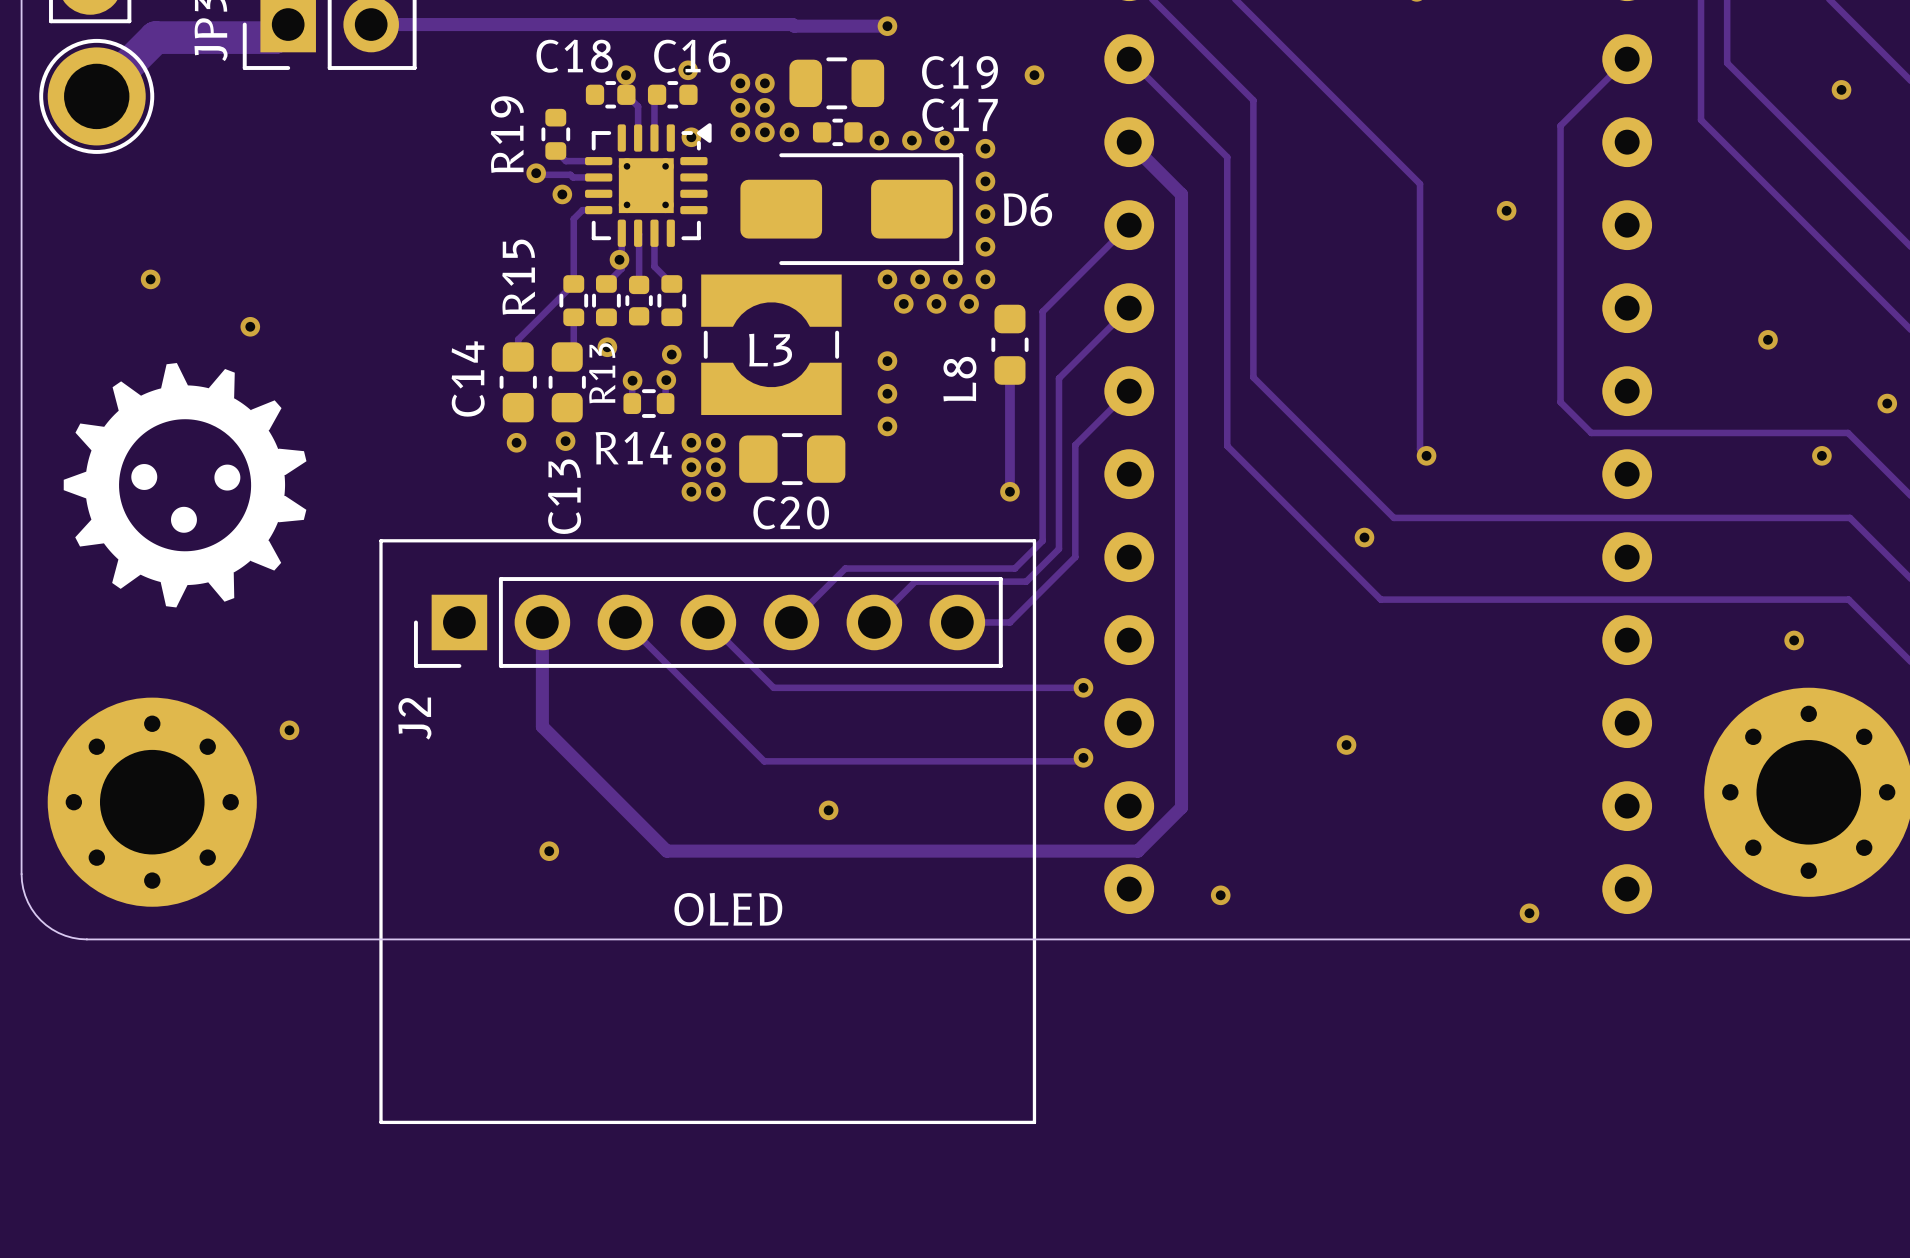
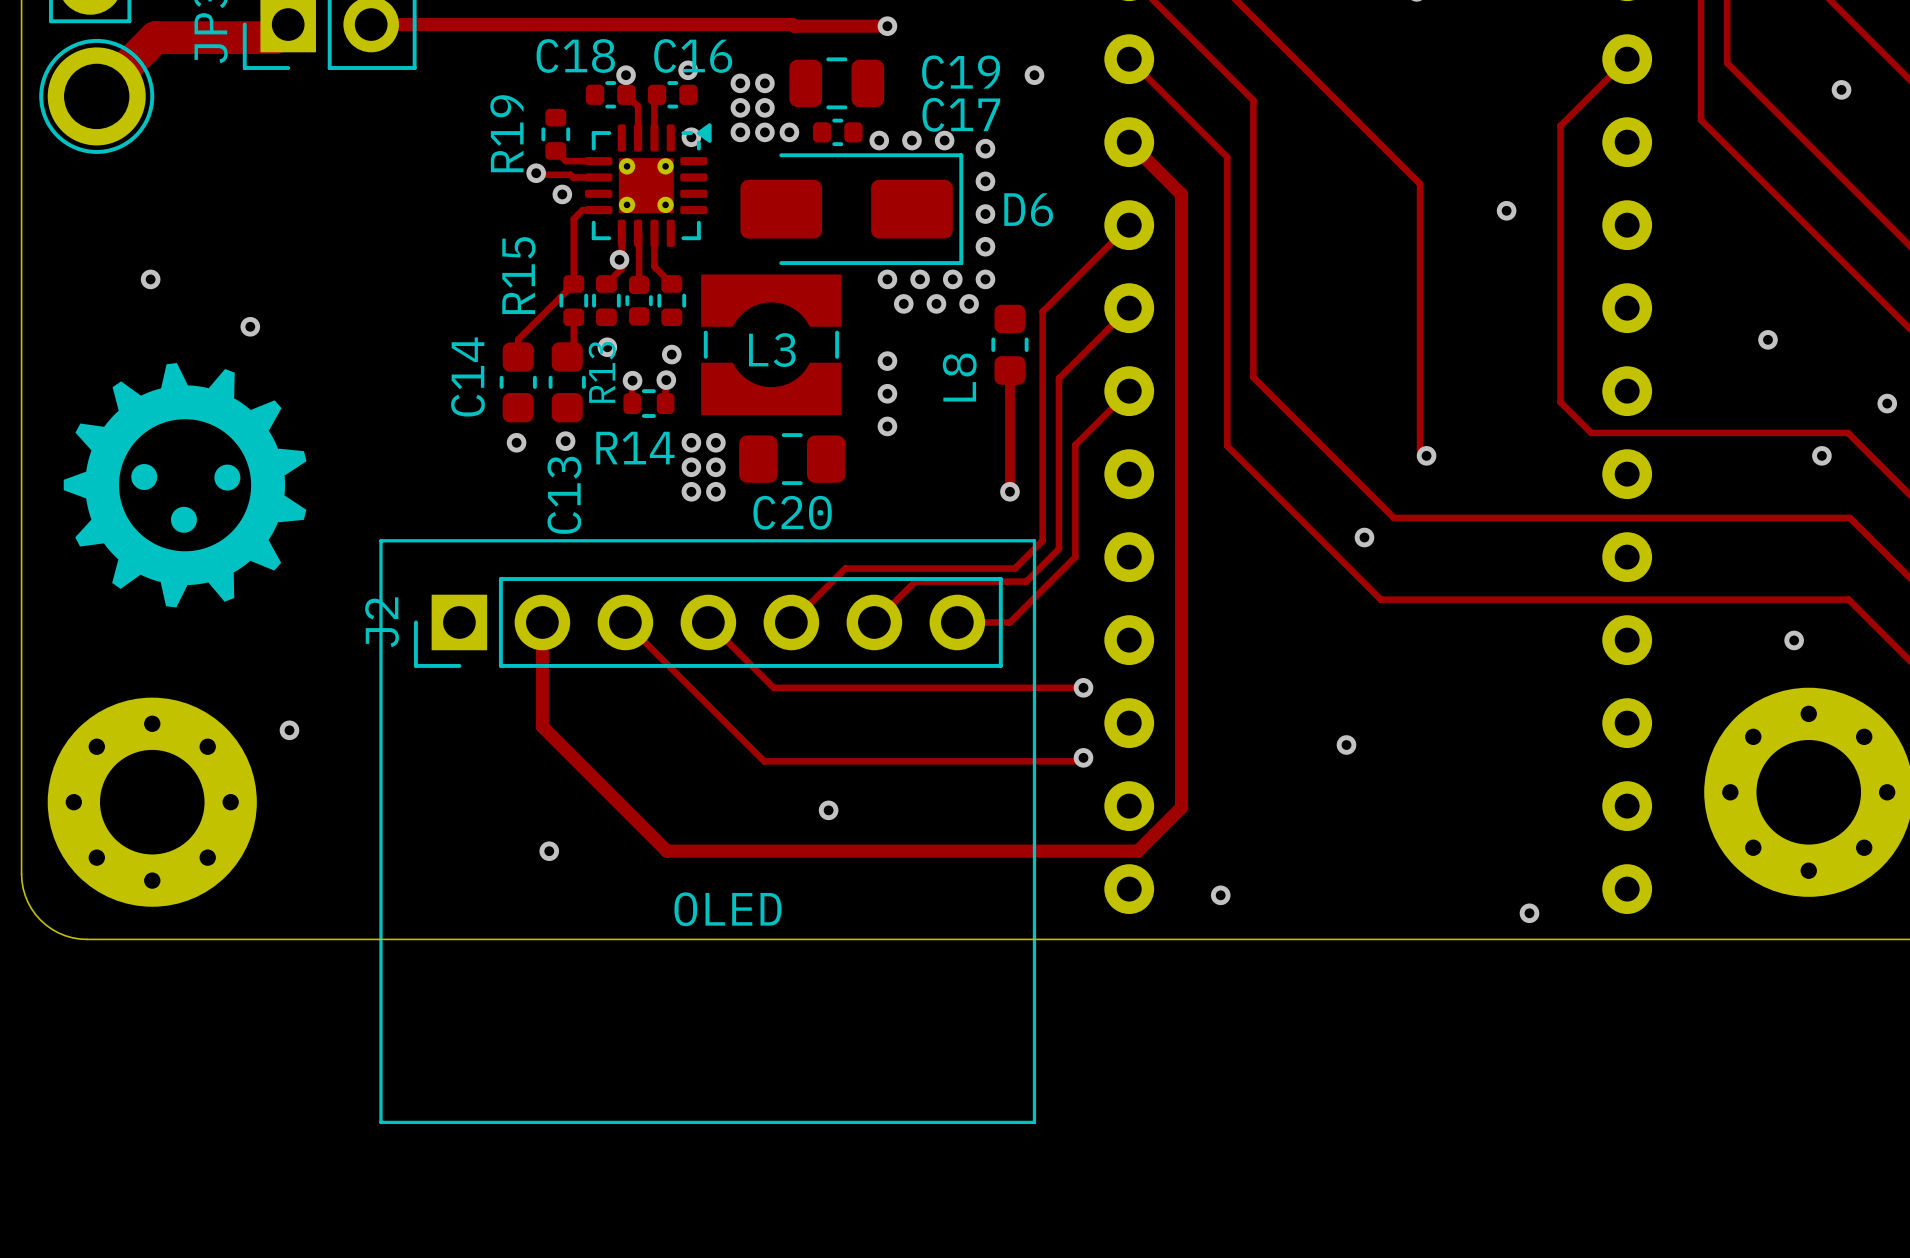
J2 name position: J2 (414, 718) -> J2 (382, 622)

